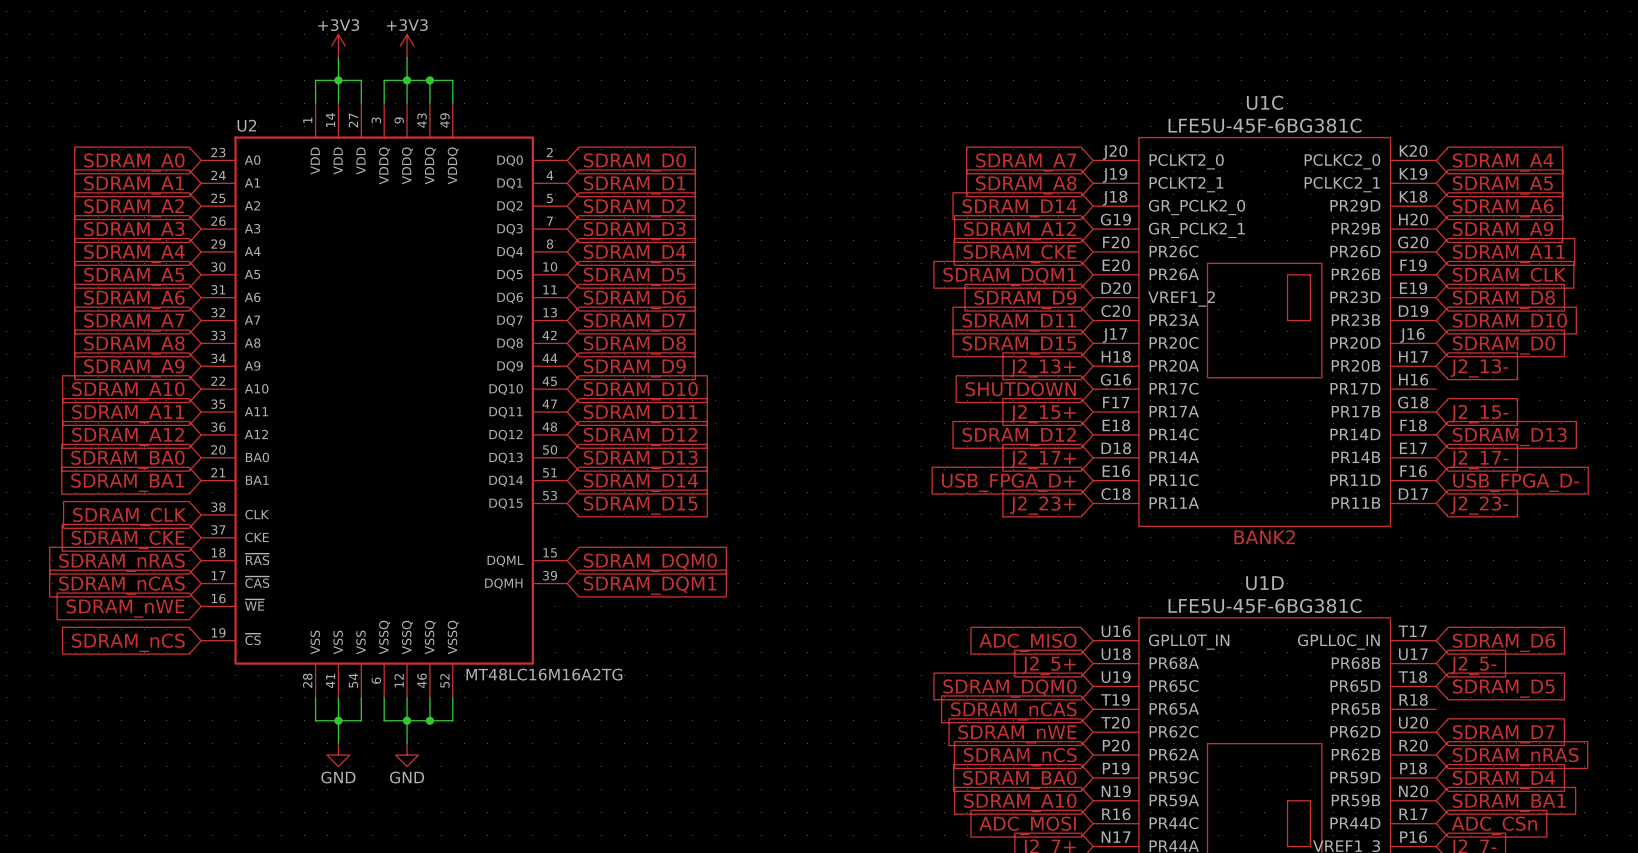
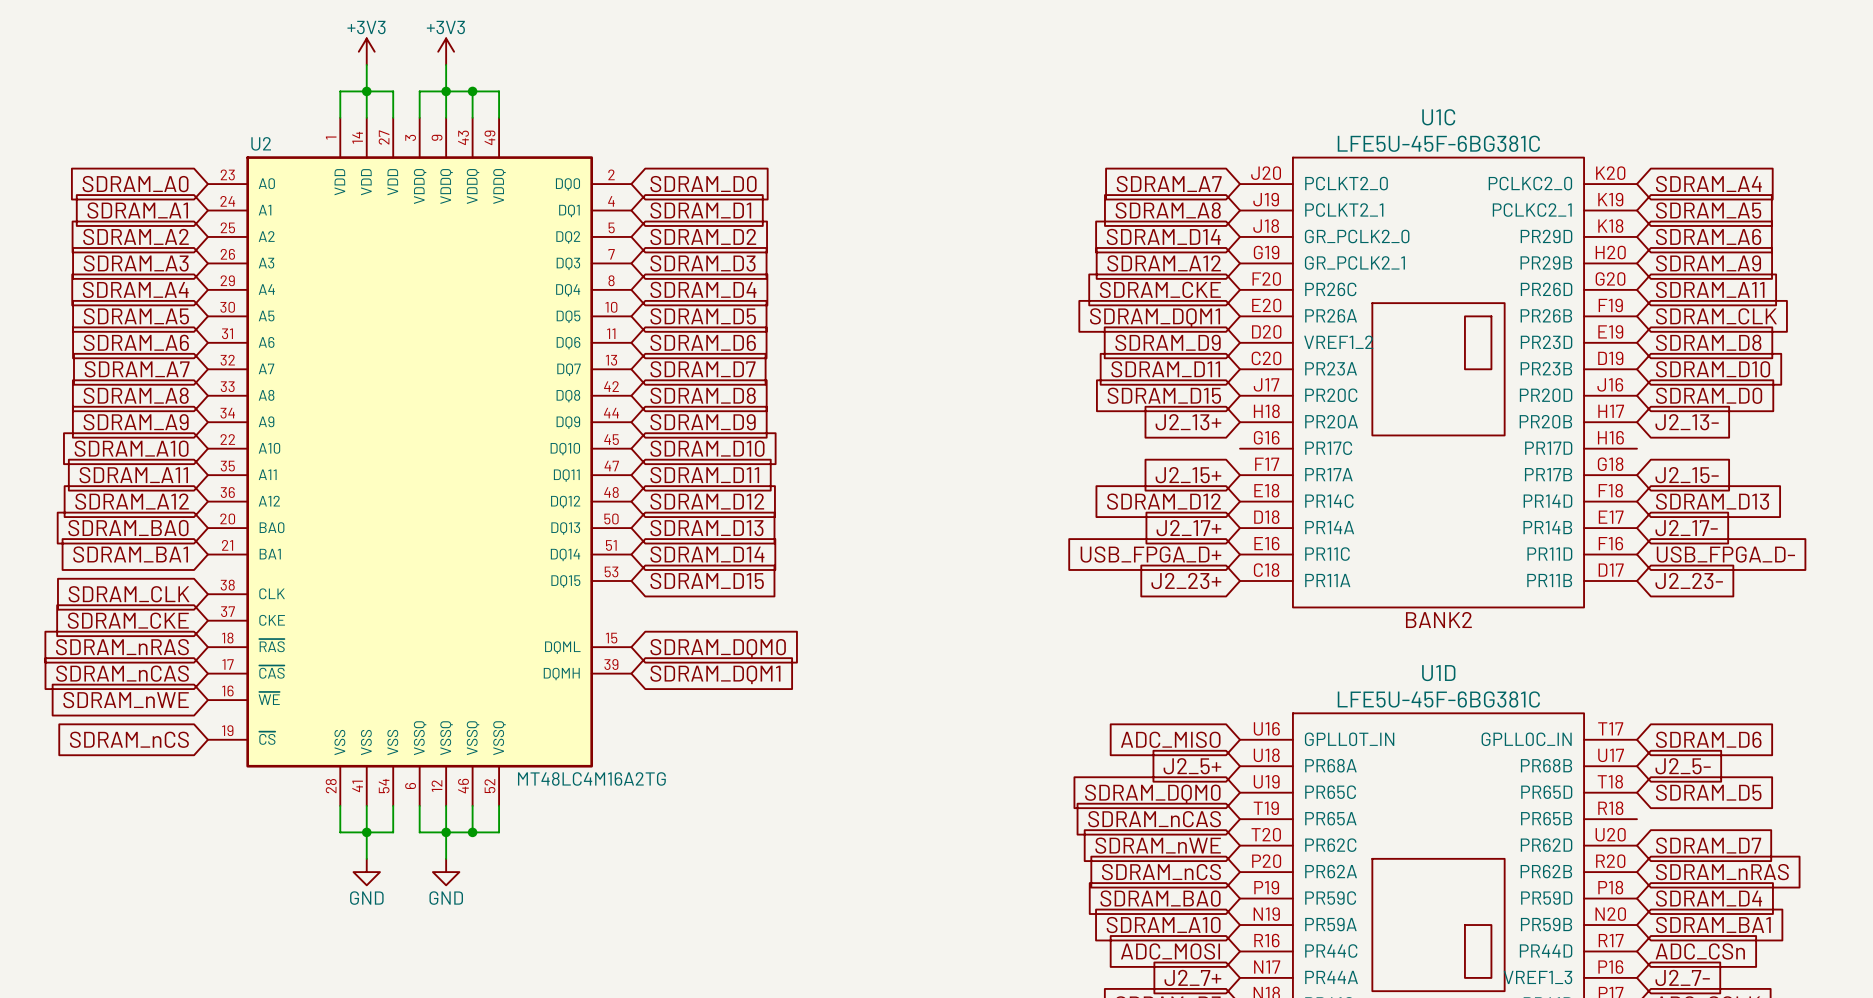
global label: SHUTDOWN (1020, 389) -> none
U2 value: MT48LC16M16A2TG (544, 674) -> MT48LC4M16A2TG (591, 778)

